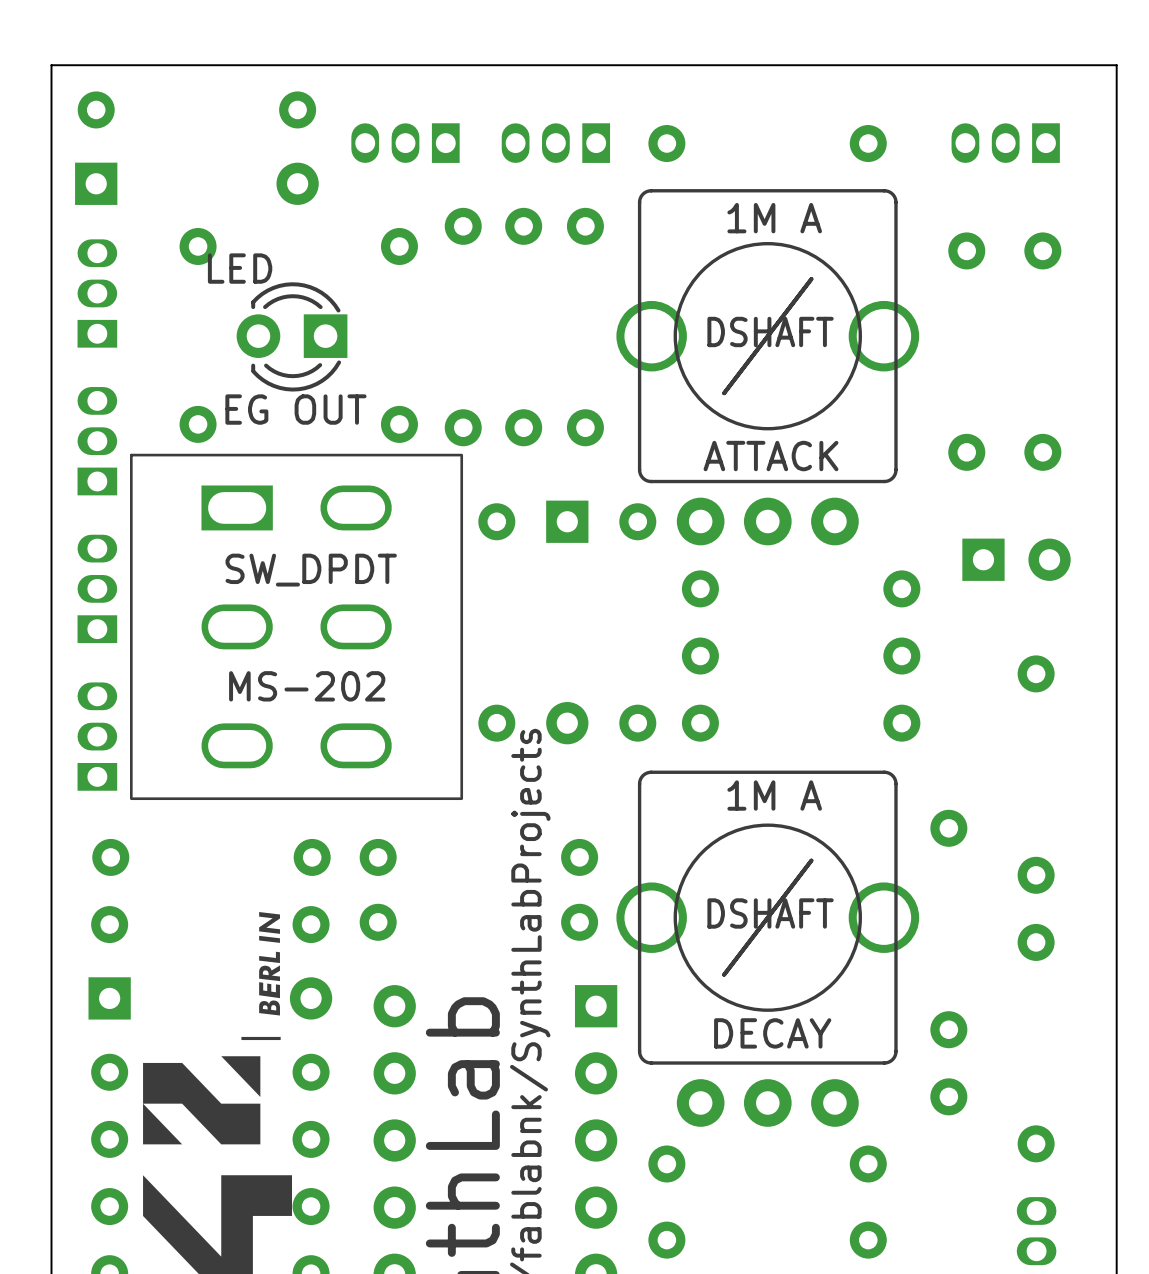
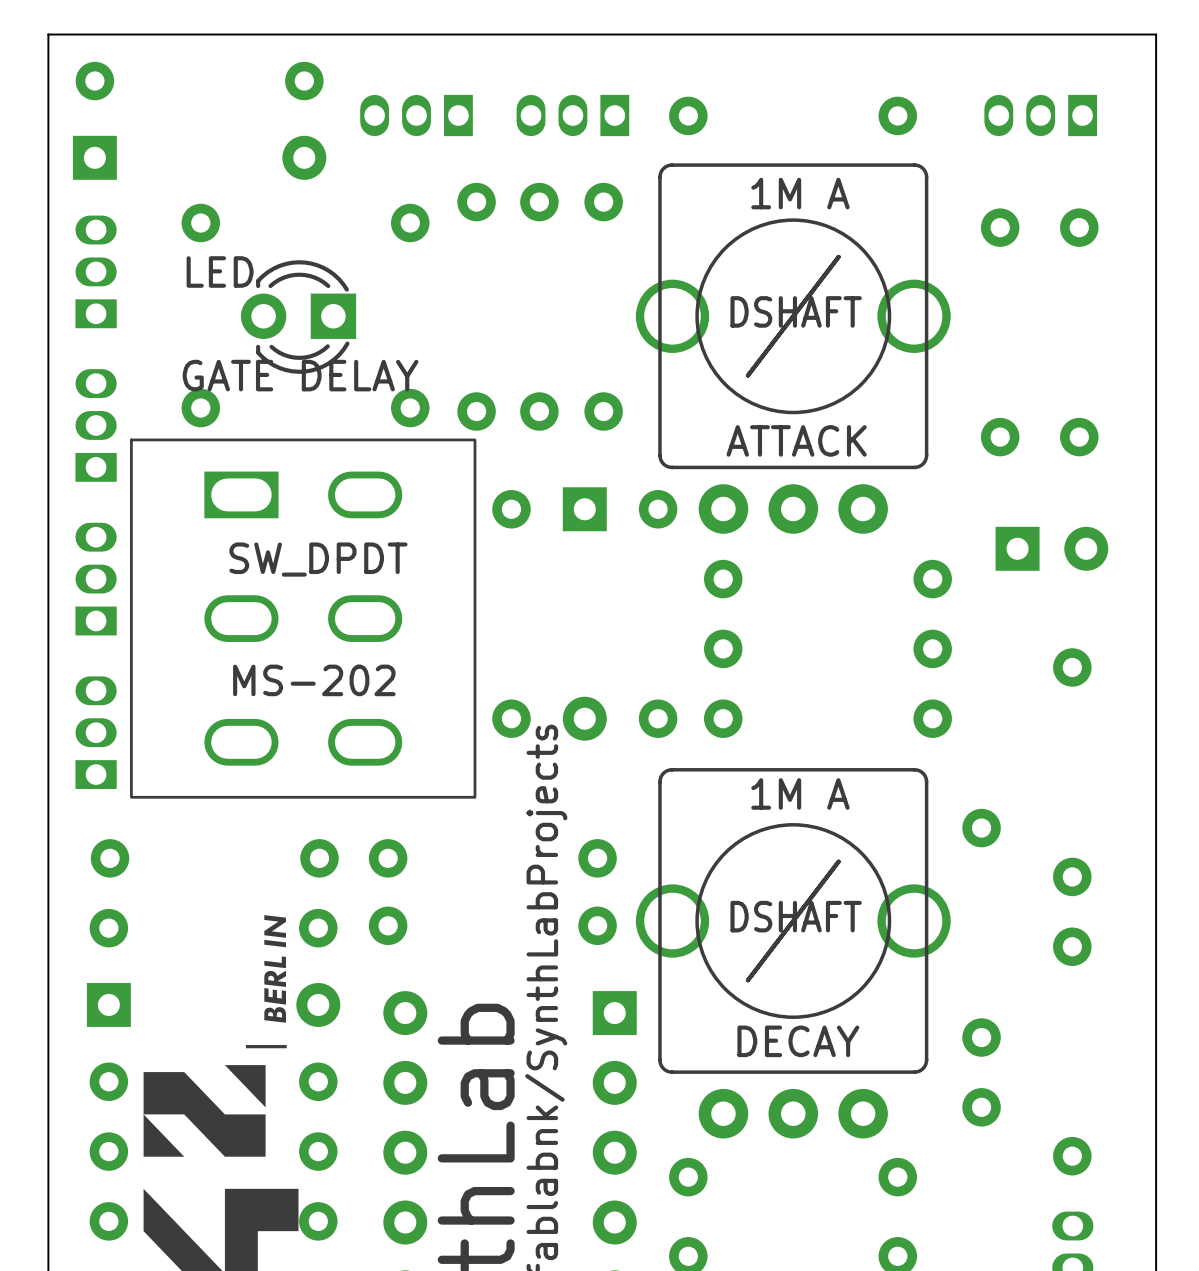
part value position: LED (240, 268) -> LED (220, 271)
part text: EG OUT (295, 409) -> GATE DELAY (300, 375)

